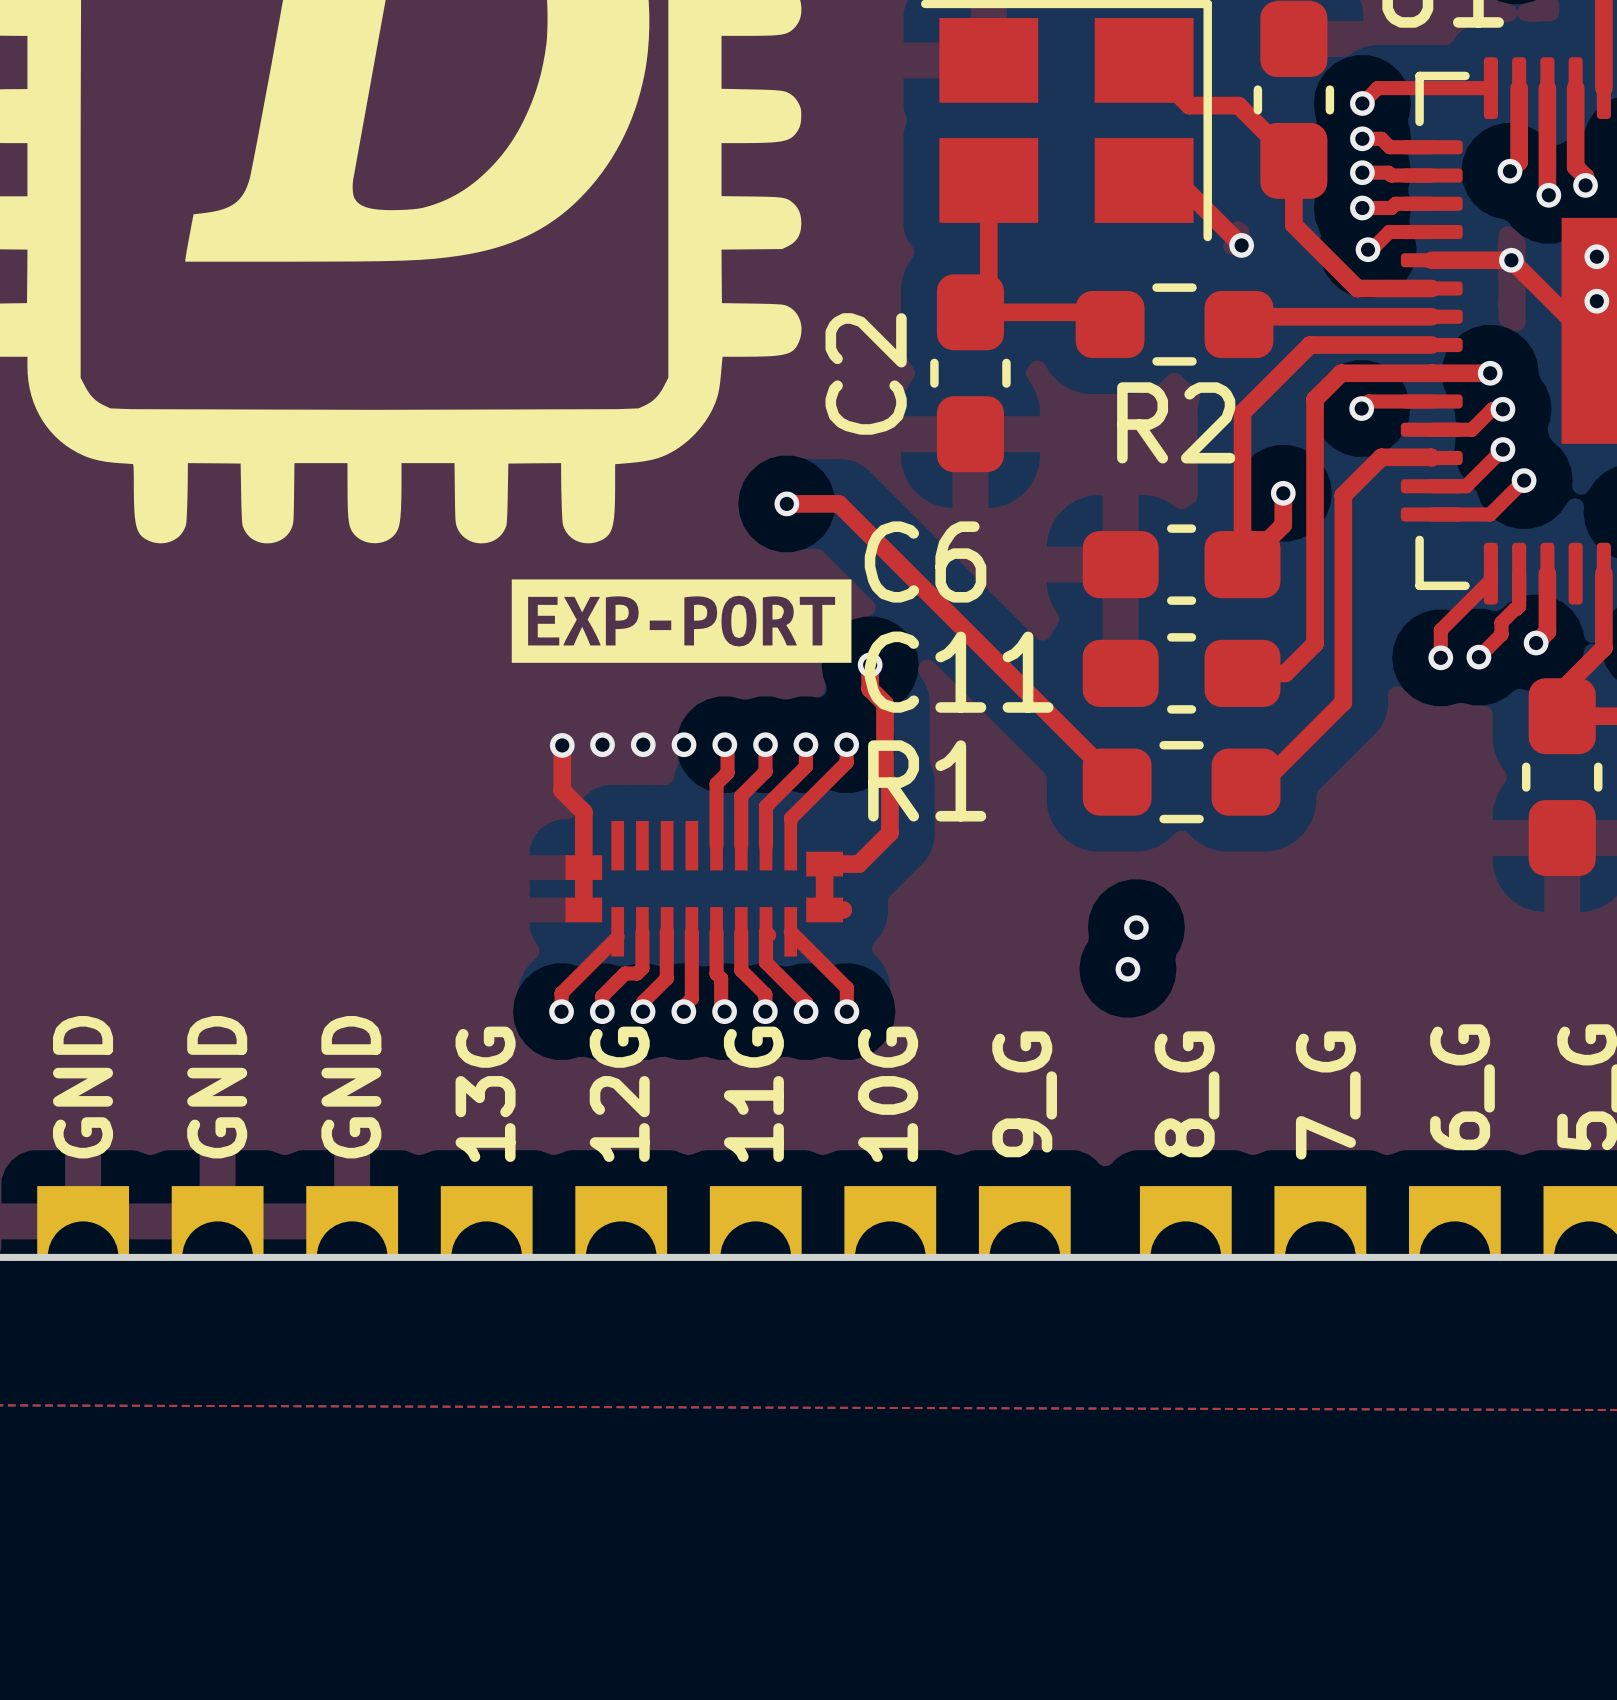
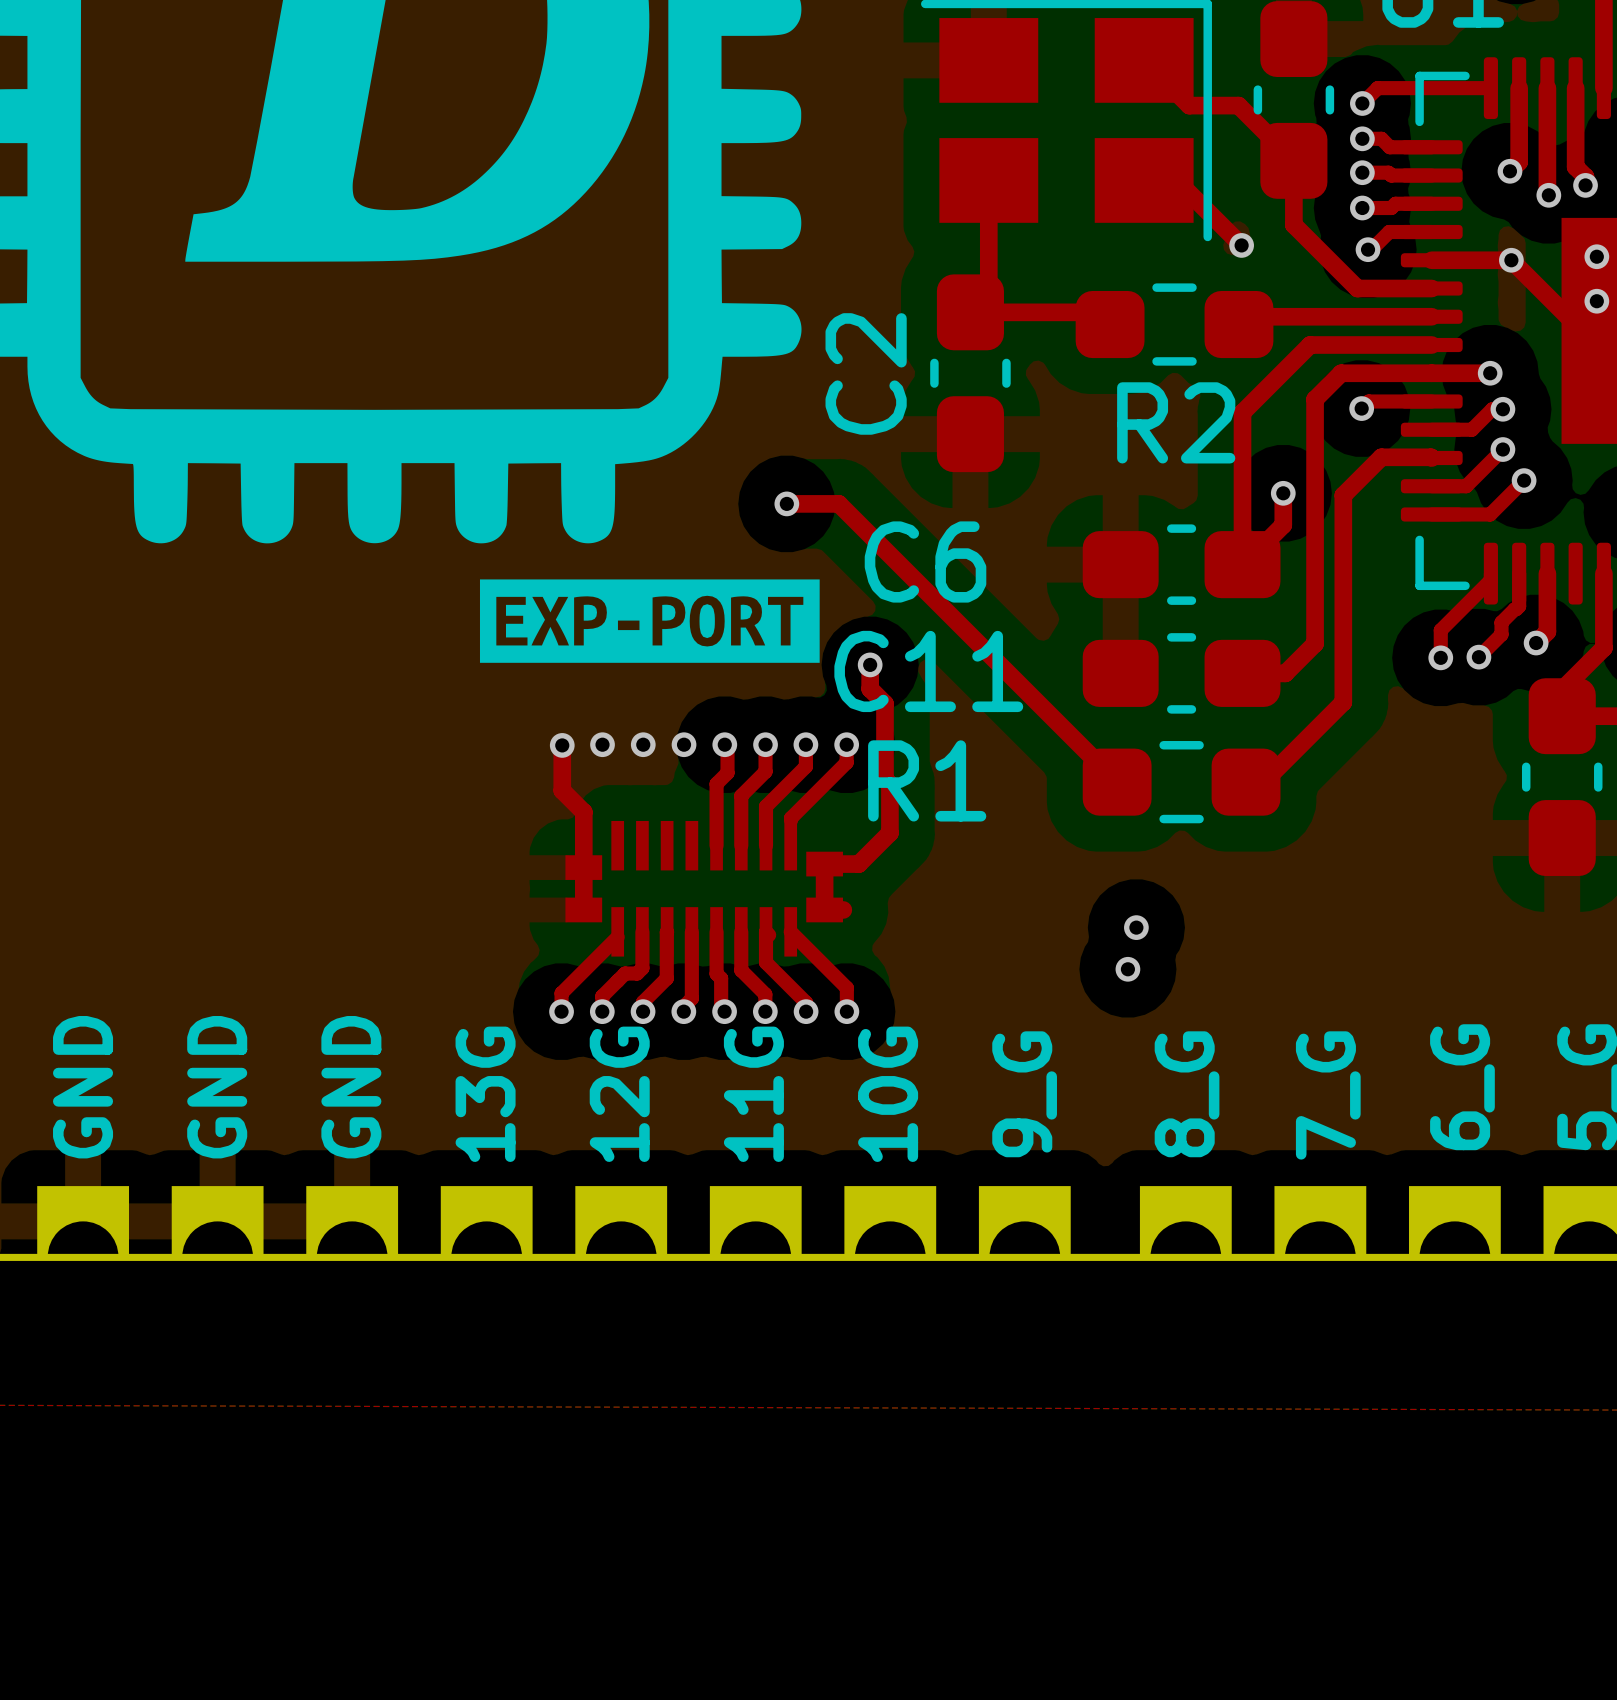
drawing position: (681, 621) -> (649, 621)
C11 name position: C11 (959, 672) -> C11 (928, 671)

